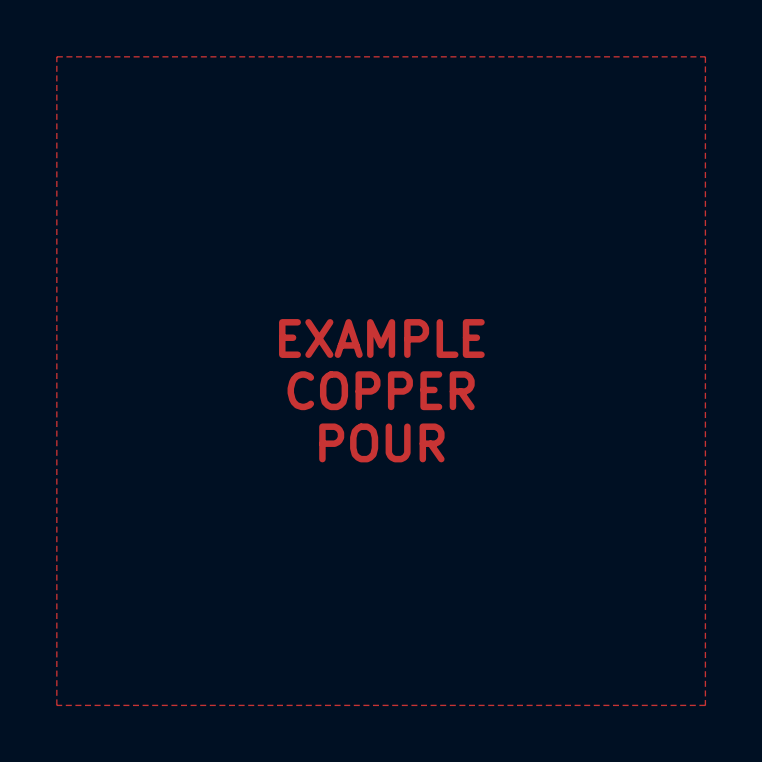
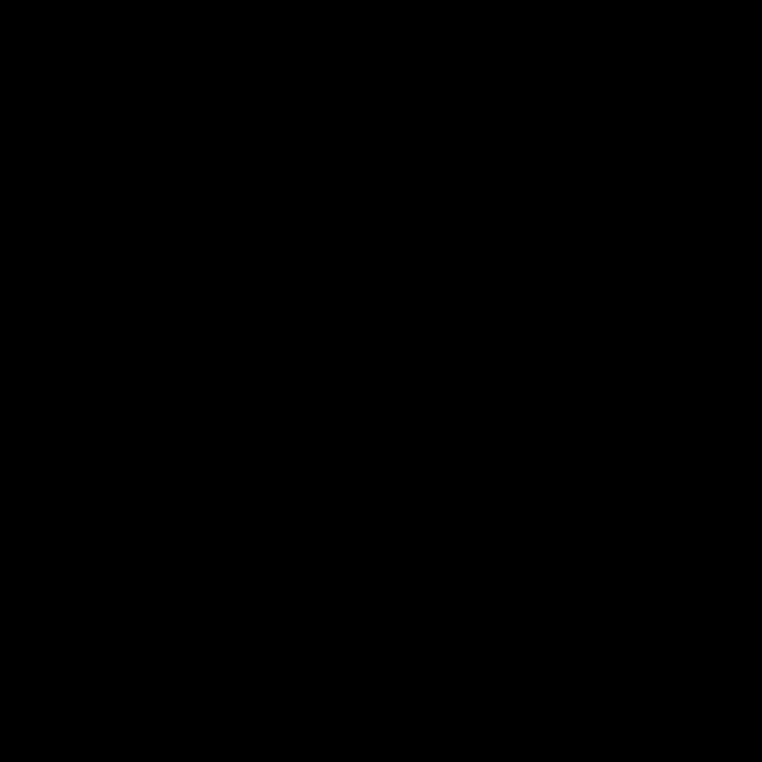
top zone outline: (56, 56) (56, 705) (705, 705) (705, 56) (56, 56) -> none
text: EXAMPLE (381, 338) -> none
text: COPPER (381, 390) -> none
text: POUR (381, 442) -> none

